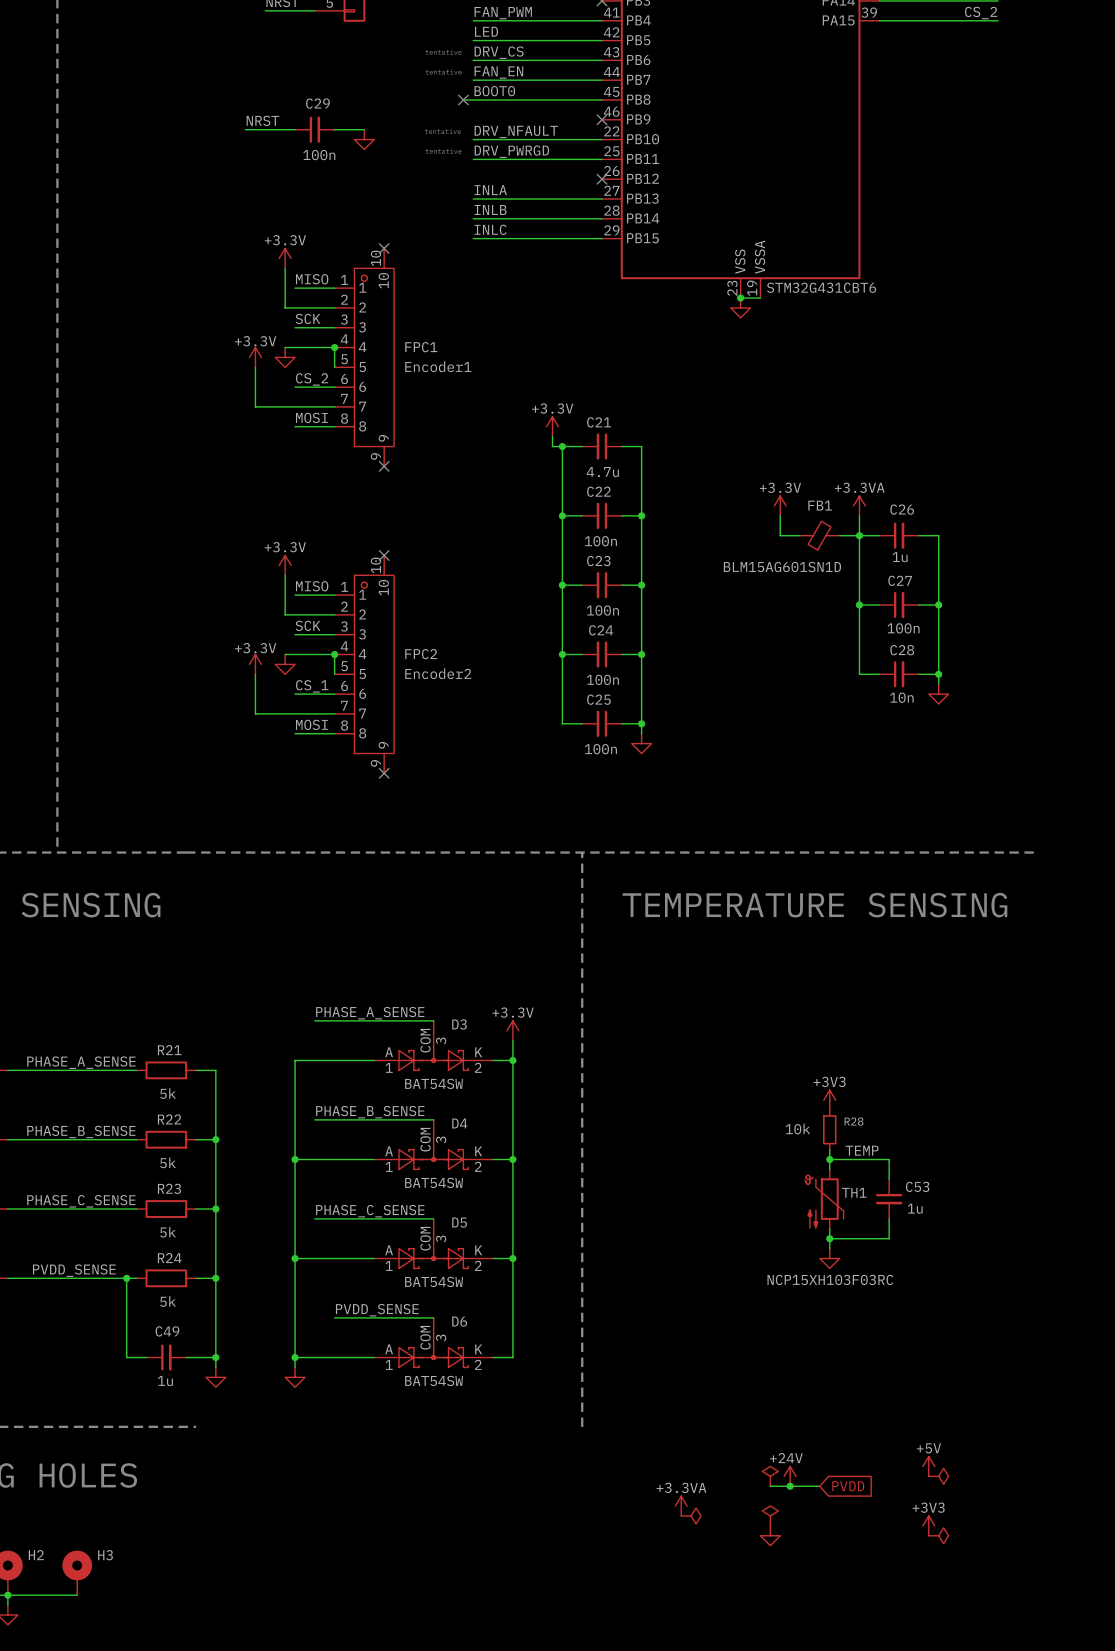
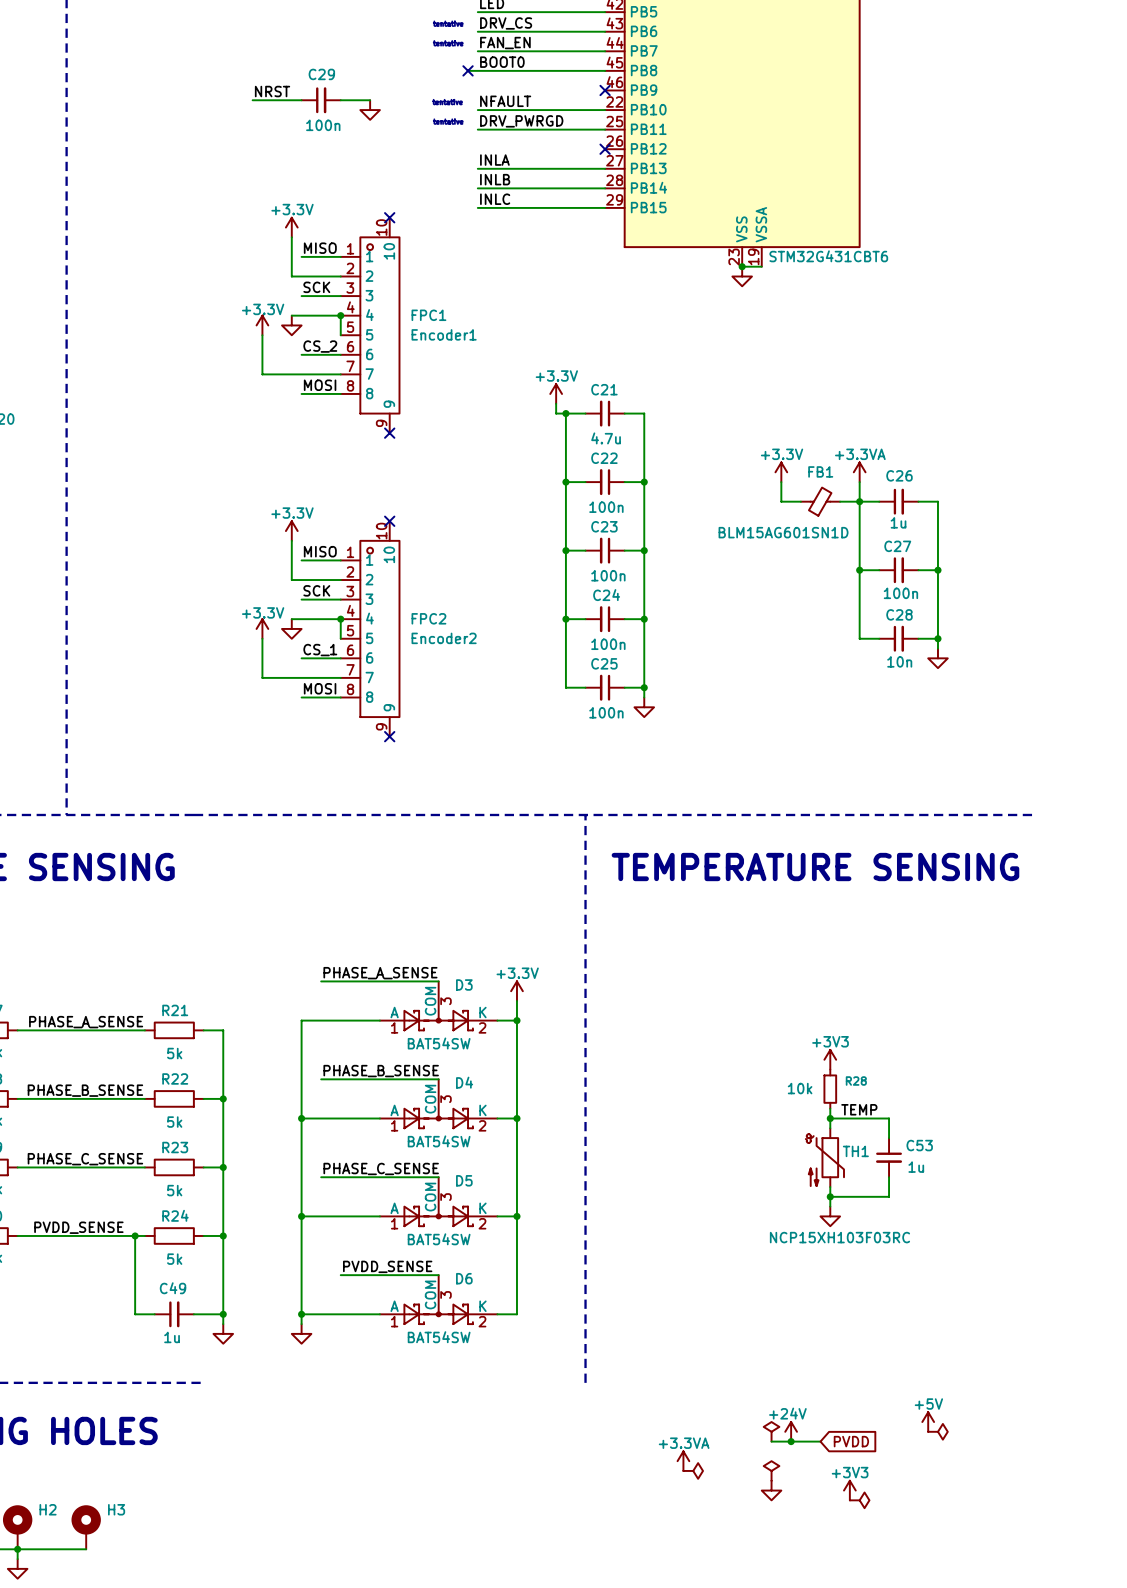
label: DRV_NFAULT (516, 131) -> NFAULT (505, 101)
power symbol position: +3V3 (928, 1525) -> +3V3 (849, 1490)
power symbol position: (938, 1535) -> (859, 1500)

